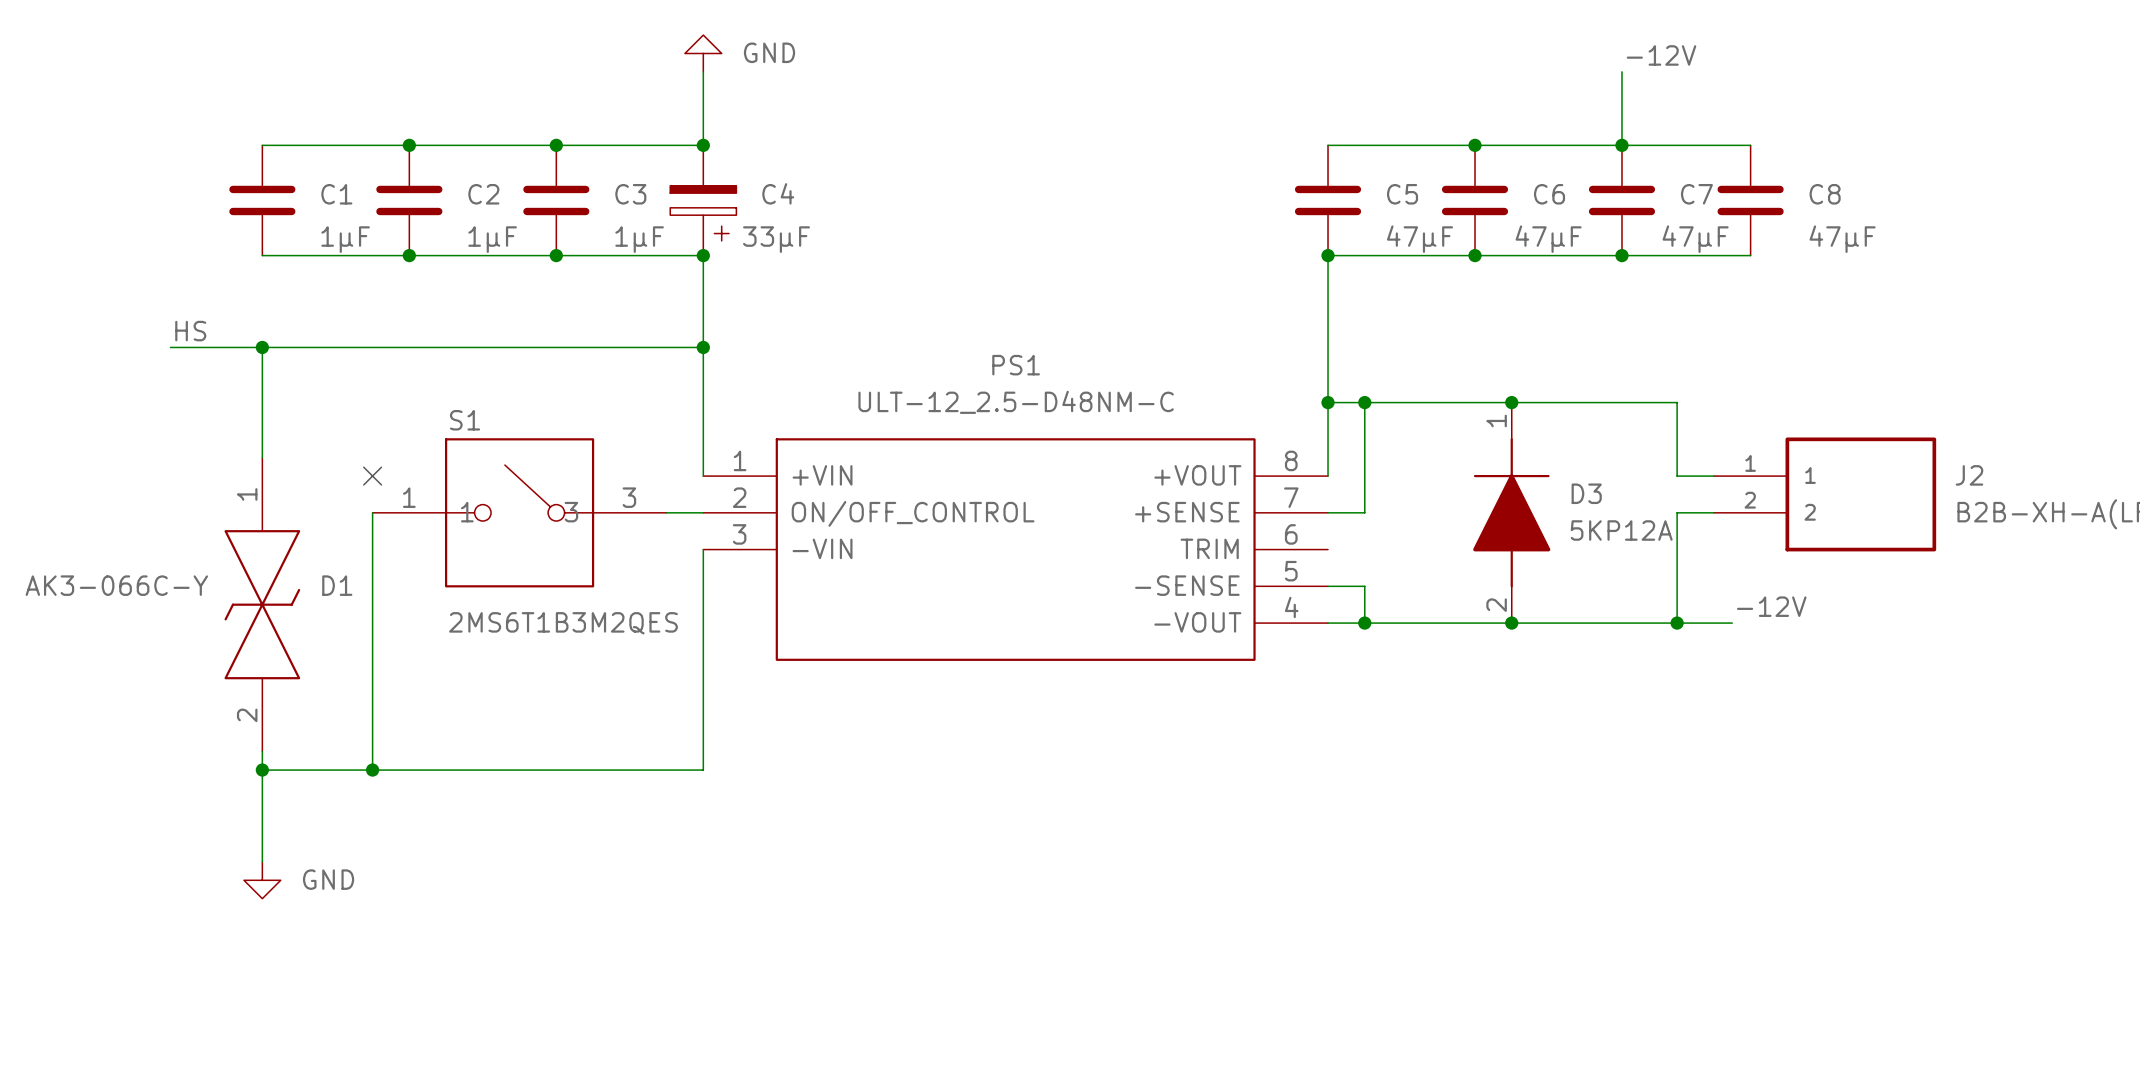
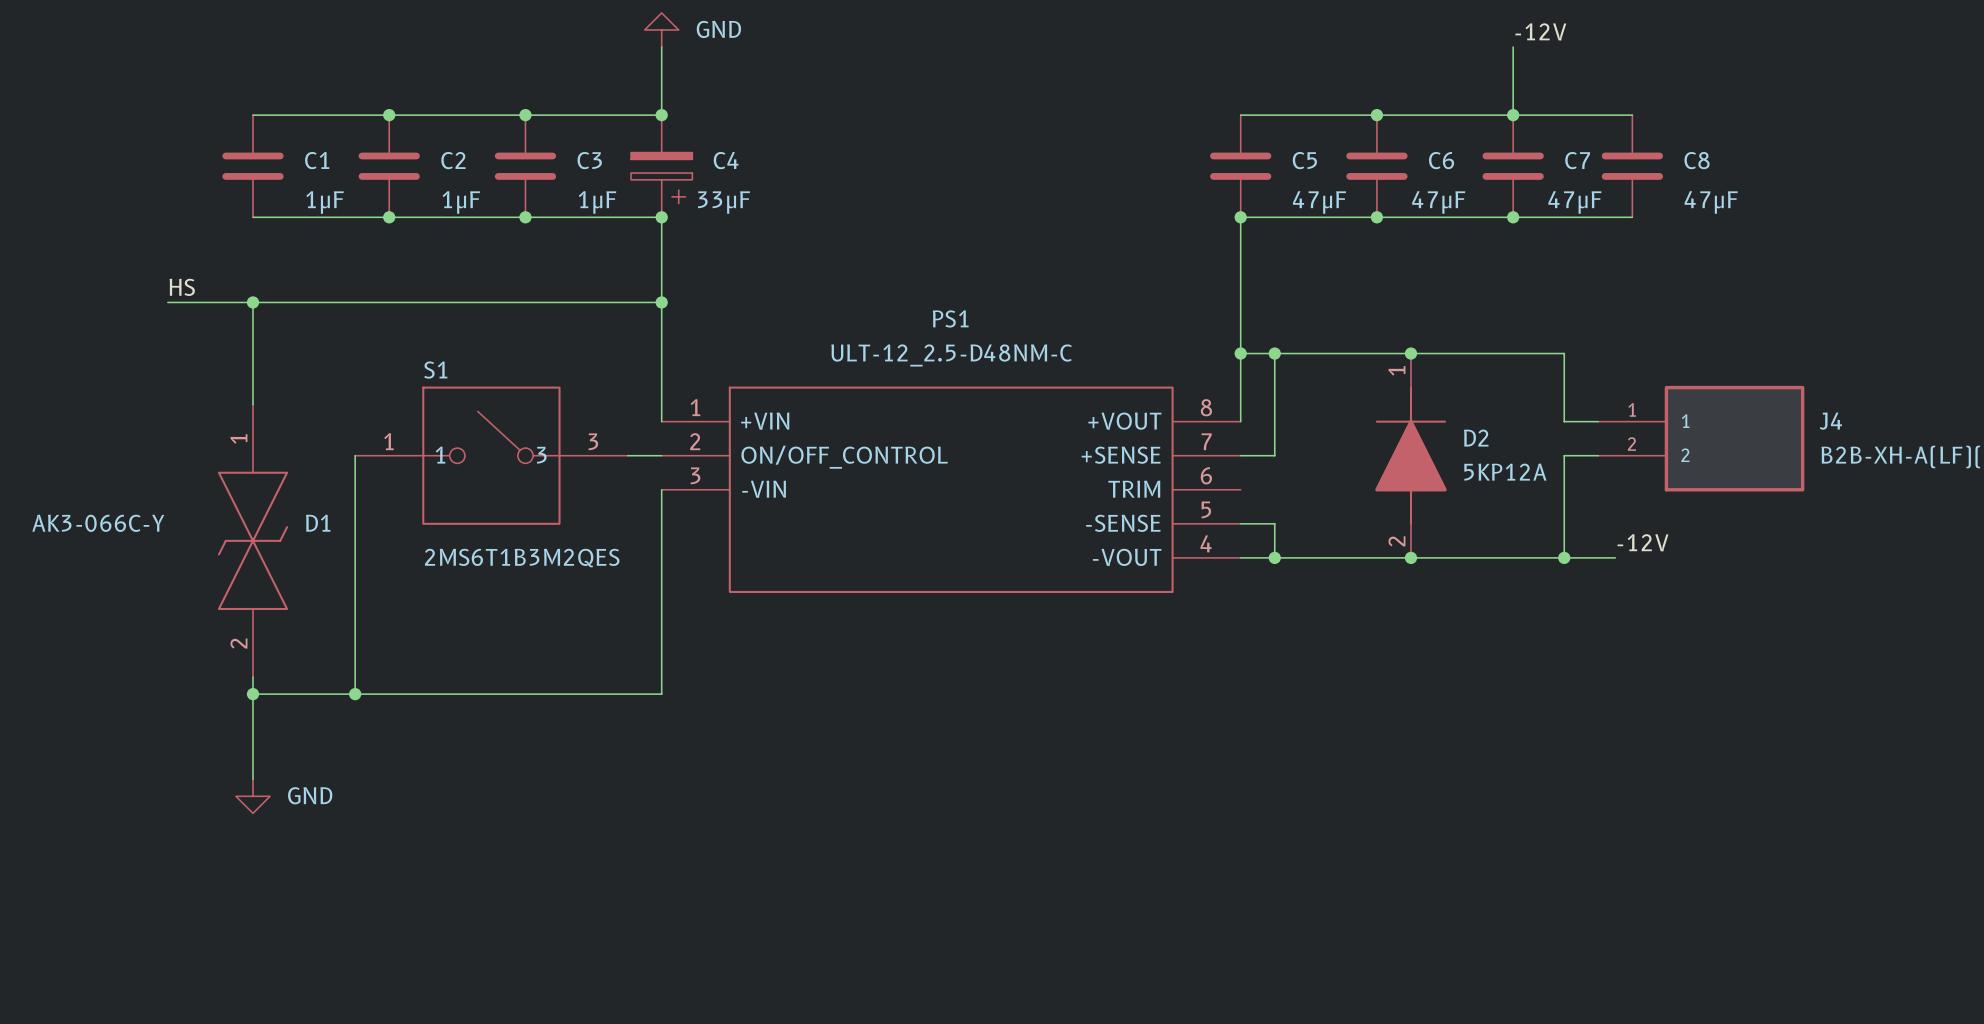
J2 name: J2 (1969, 475) -> J4 (1830, 421)
no-connect mark: (372, 476) -> none
D3 name: D3 (1586, 493) -> D2 (1476, 438)

